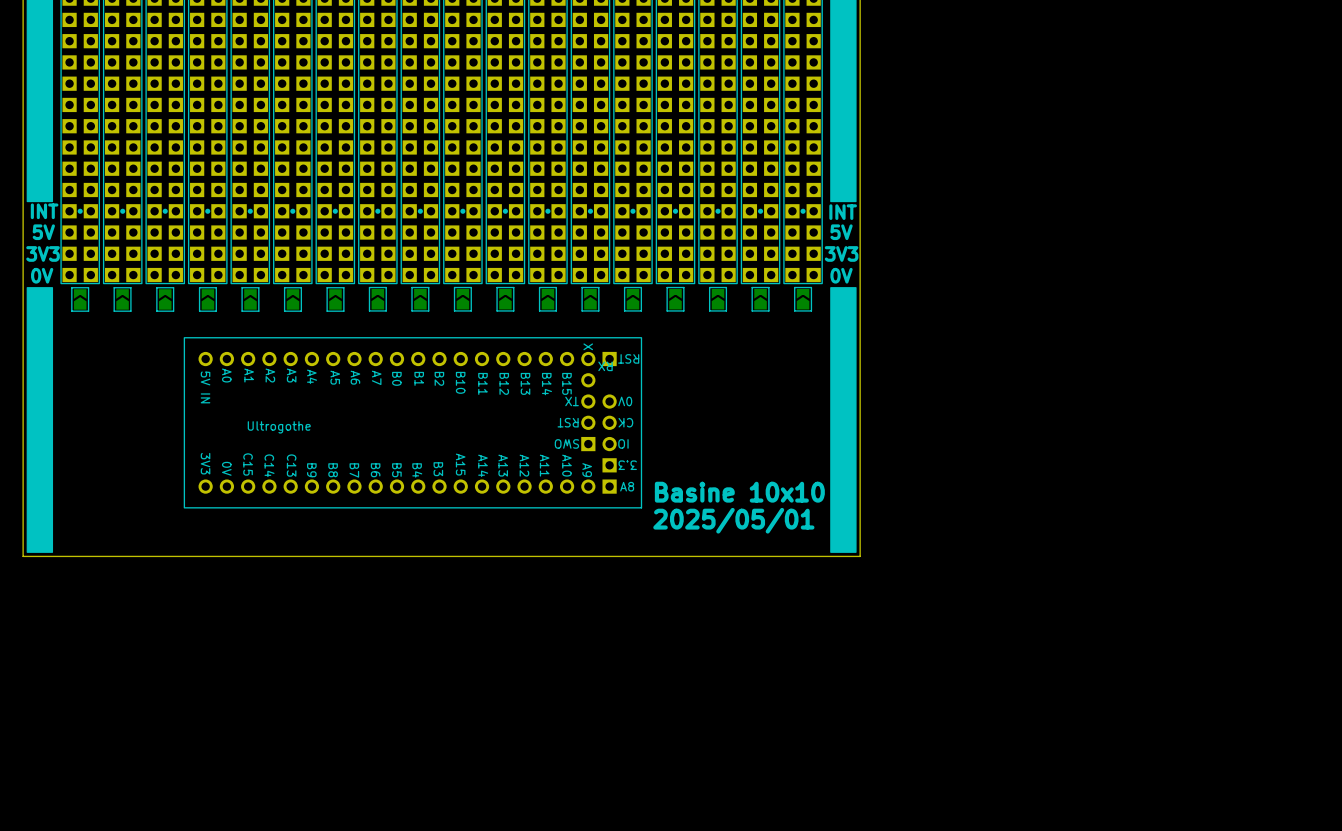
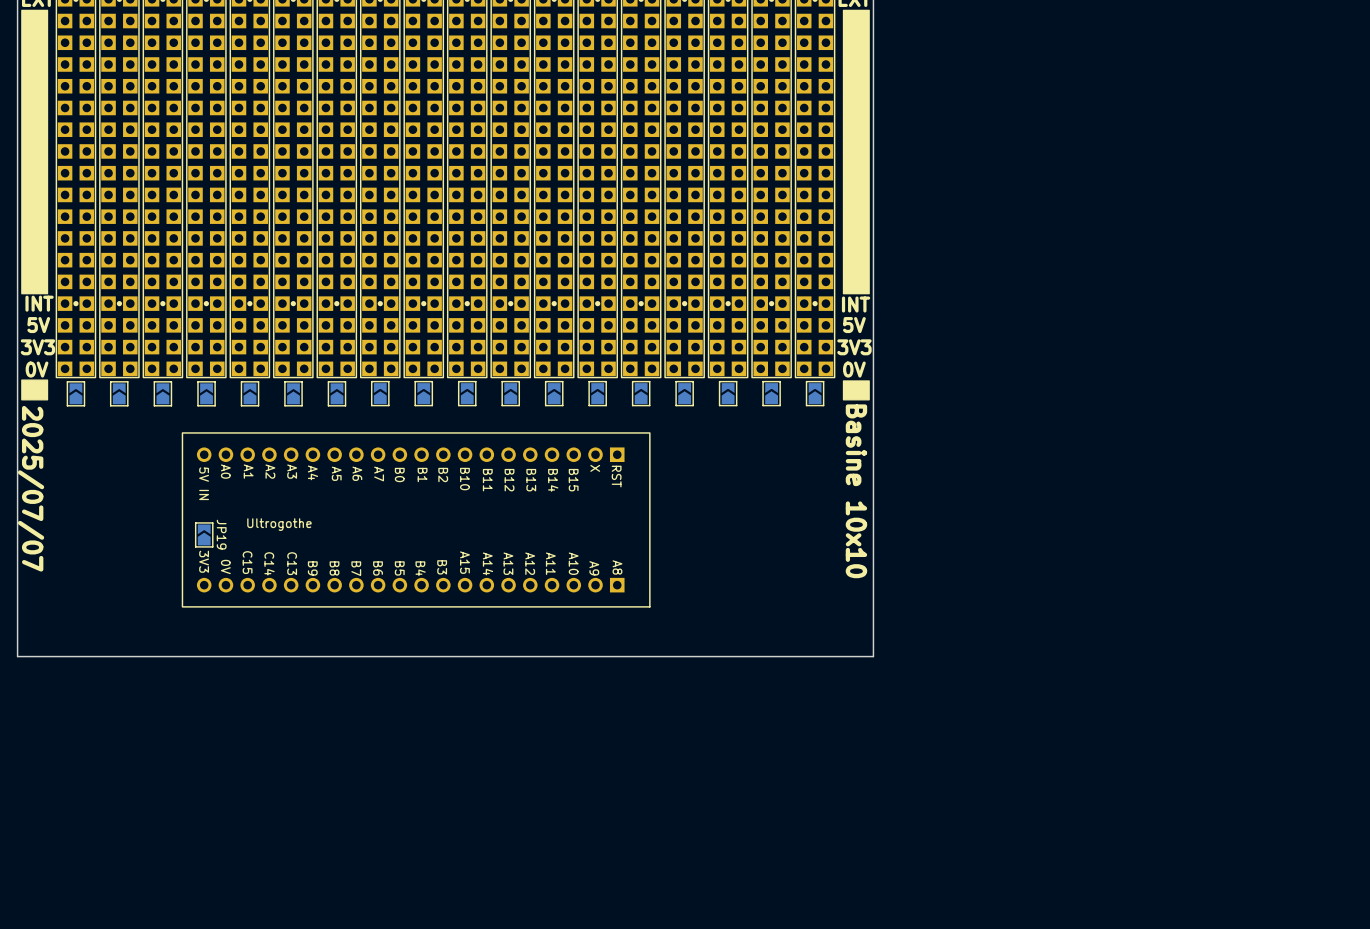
drawing: none -> [21, 379, 49, 401]
drawing: none -> [842, 380, 870, 401]
drawing: [26, 287, 54, 553] -> none
drawing: [830, 287, 857, 553] -> none
part footprint: [183, 337, 642, 509] -> [182, 432, 651, 608]
text: none -> 2025/07/07 (31, 488)
text: none -> Basine 10x10 (856, 491)
JP19: none -> (204, 534)
text: Basine 10x10 (739, 492) -> none
text: 2025/05/01 (733, 520) -> none

